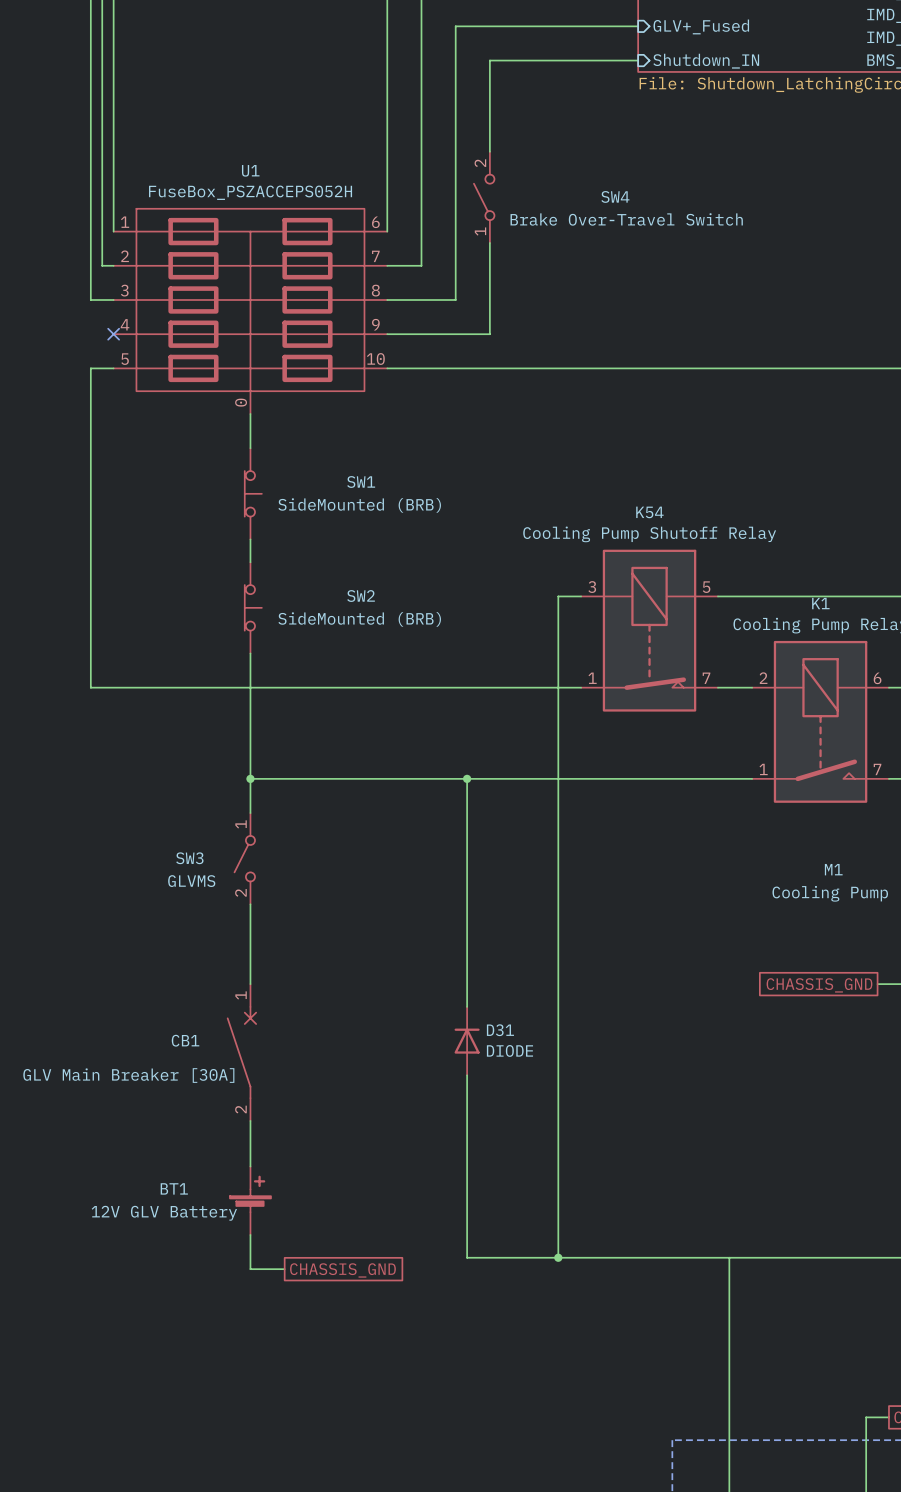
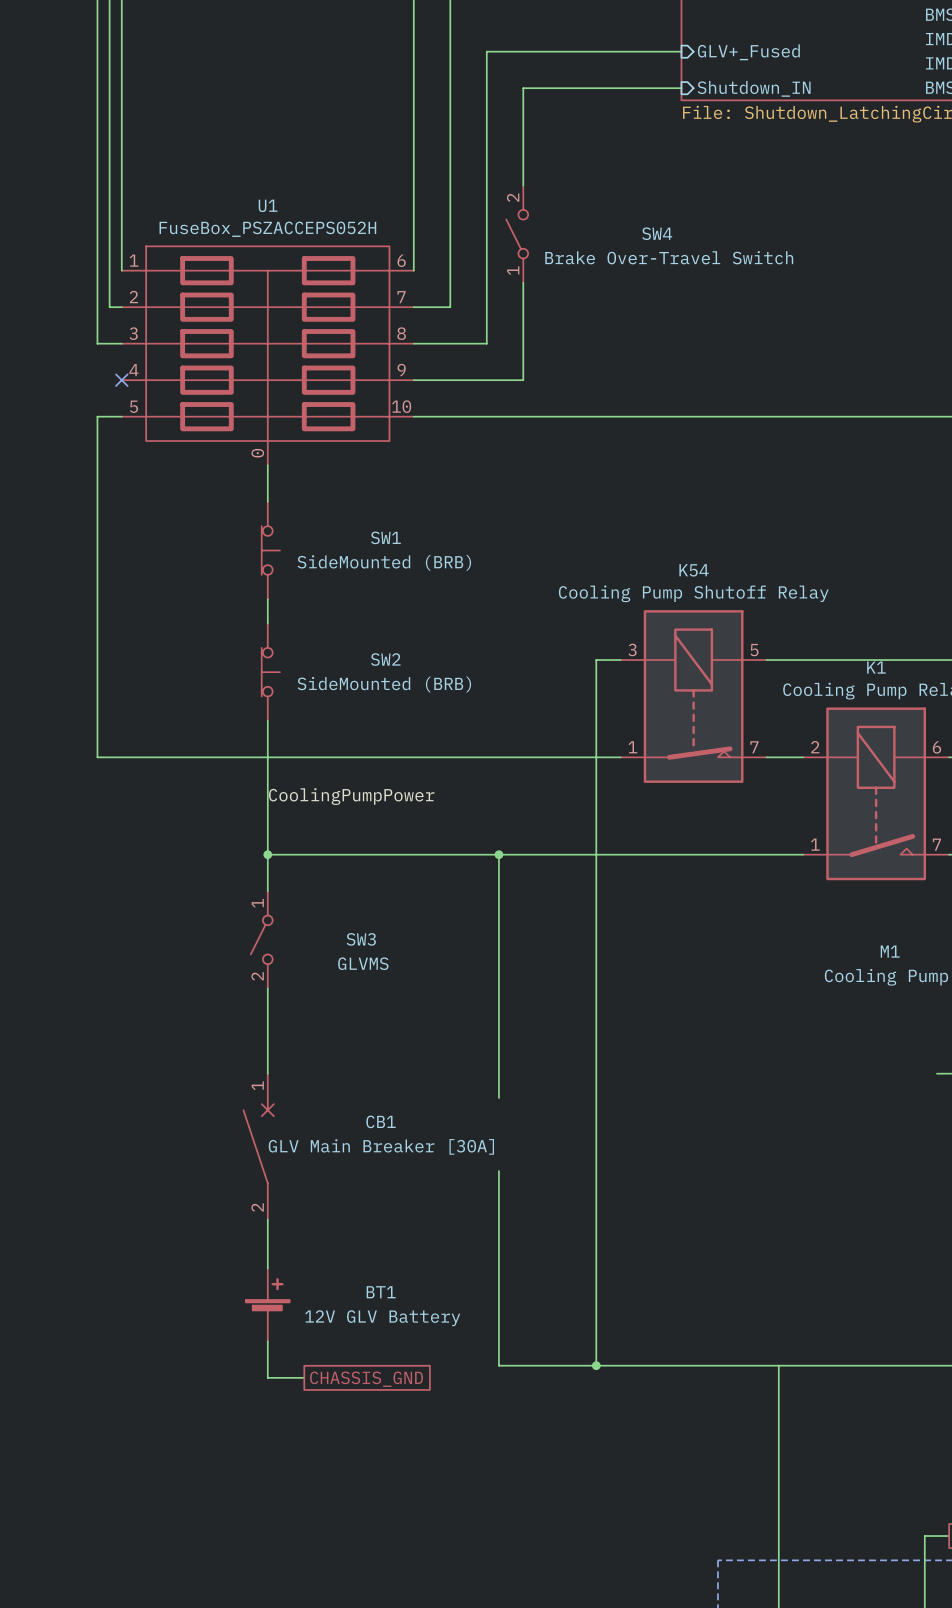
label: none -> CoolingPumpPower (351, 796)
SW3 name position: SW3 (189, 858) -> SW3 (361, 939)
SW3 value position: GLVMS (191, 881) -> GLVMS (363, 963)
global label: CHASSIS_GND (819, 985) -> none
CB1 name position: CB1 (185, 1040) -> CB1 (381, 1121)
D31: DIODE (467, 1041) -> none
CB1 value position: GLV Main Breaker [30A] (128, 1075) -> GLV Main Breaker [30A] (381, 1146)
BT1 name position: BT1 (174, 1188) -> BT1 (381, 1292)
BT1 value position: 12V GLV Battery (164, 1213) -> 12V GLV Battery (382, 1318)

